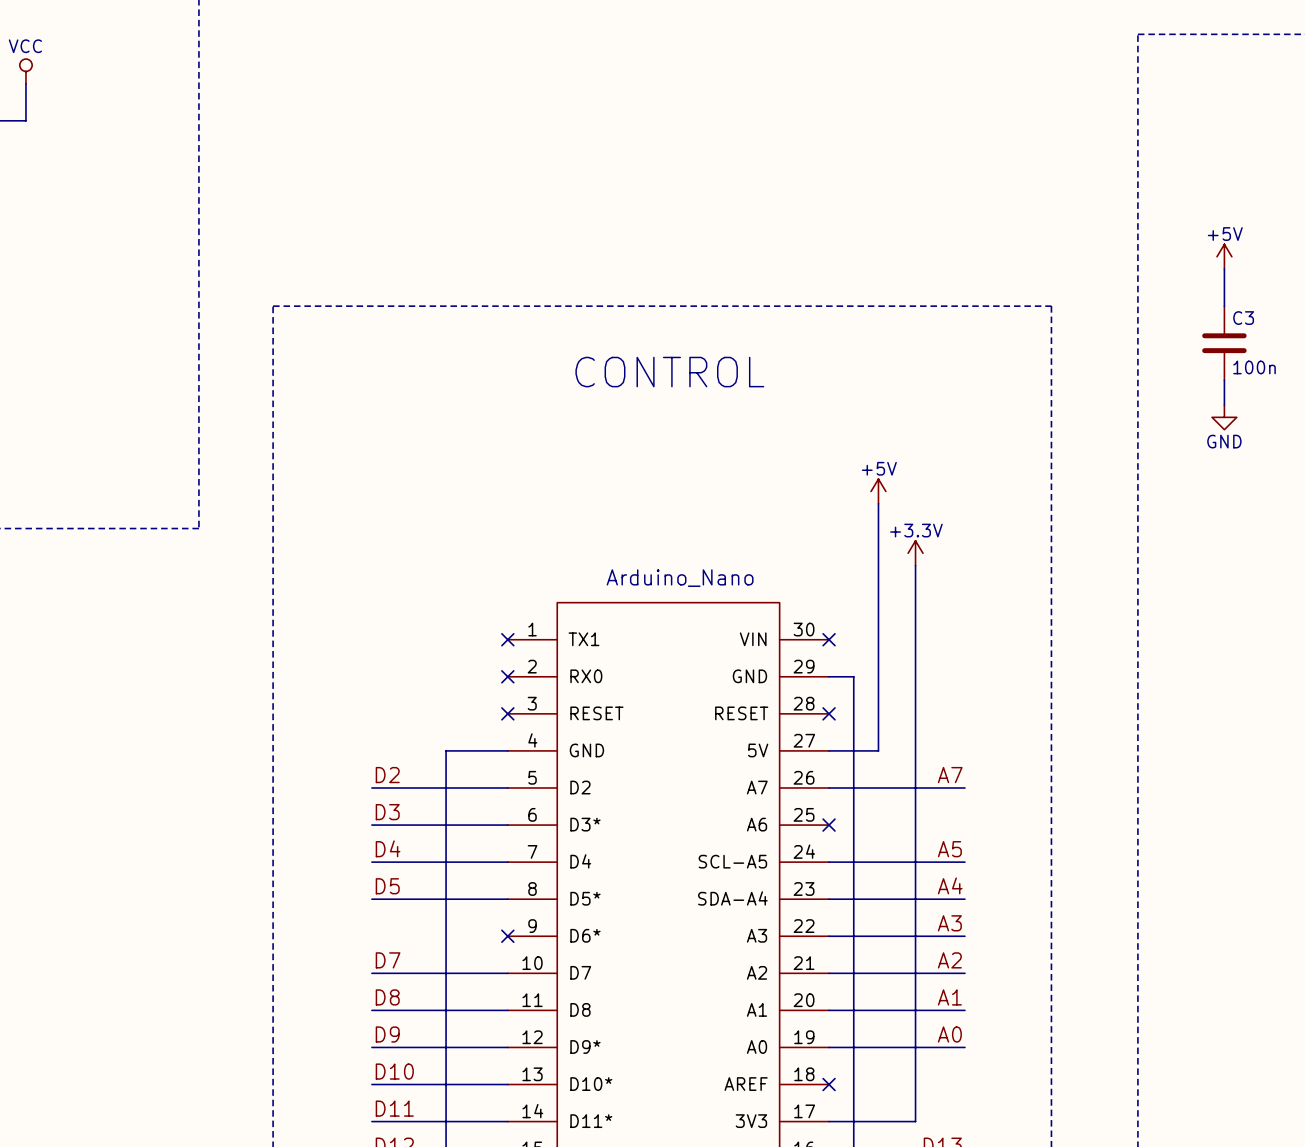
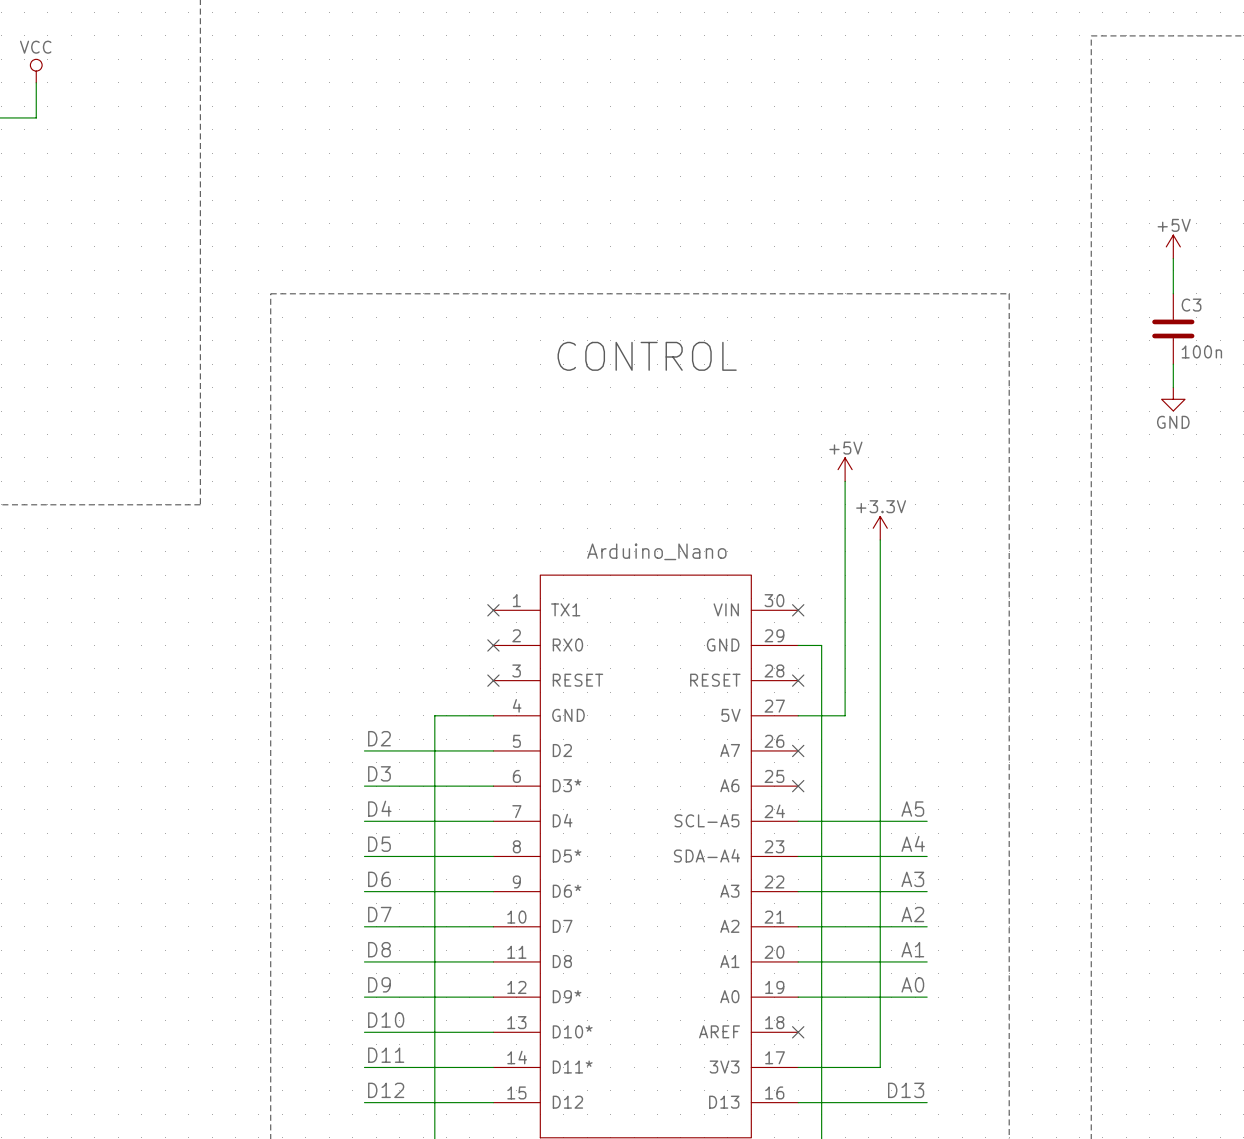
label: A7 (950, 775) -> none
wire: (829, 787) (964, 787) -> none
no-connect mark: none -> (798, 750)
label: none -> D6 (379, 879)
wire: none -> (364, 891) (493, 891)
no-connect mark: (507, 936) -> none

